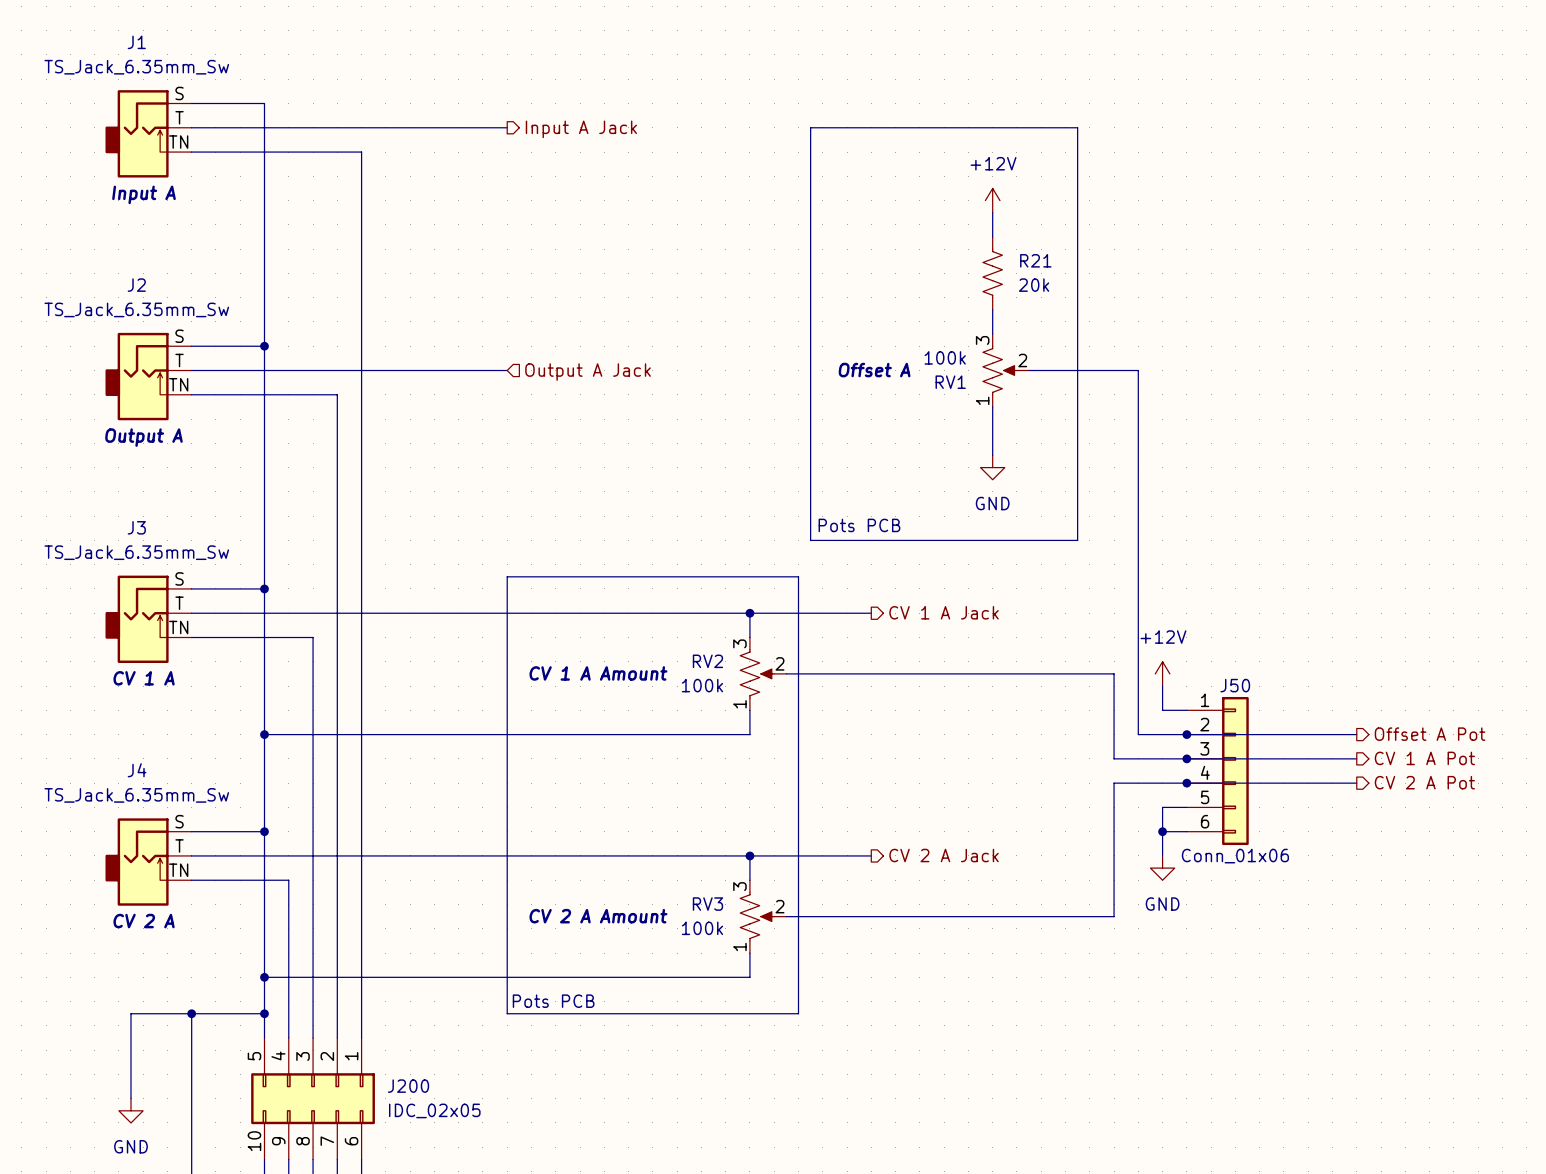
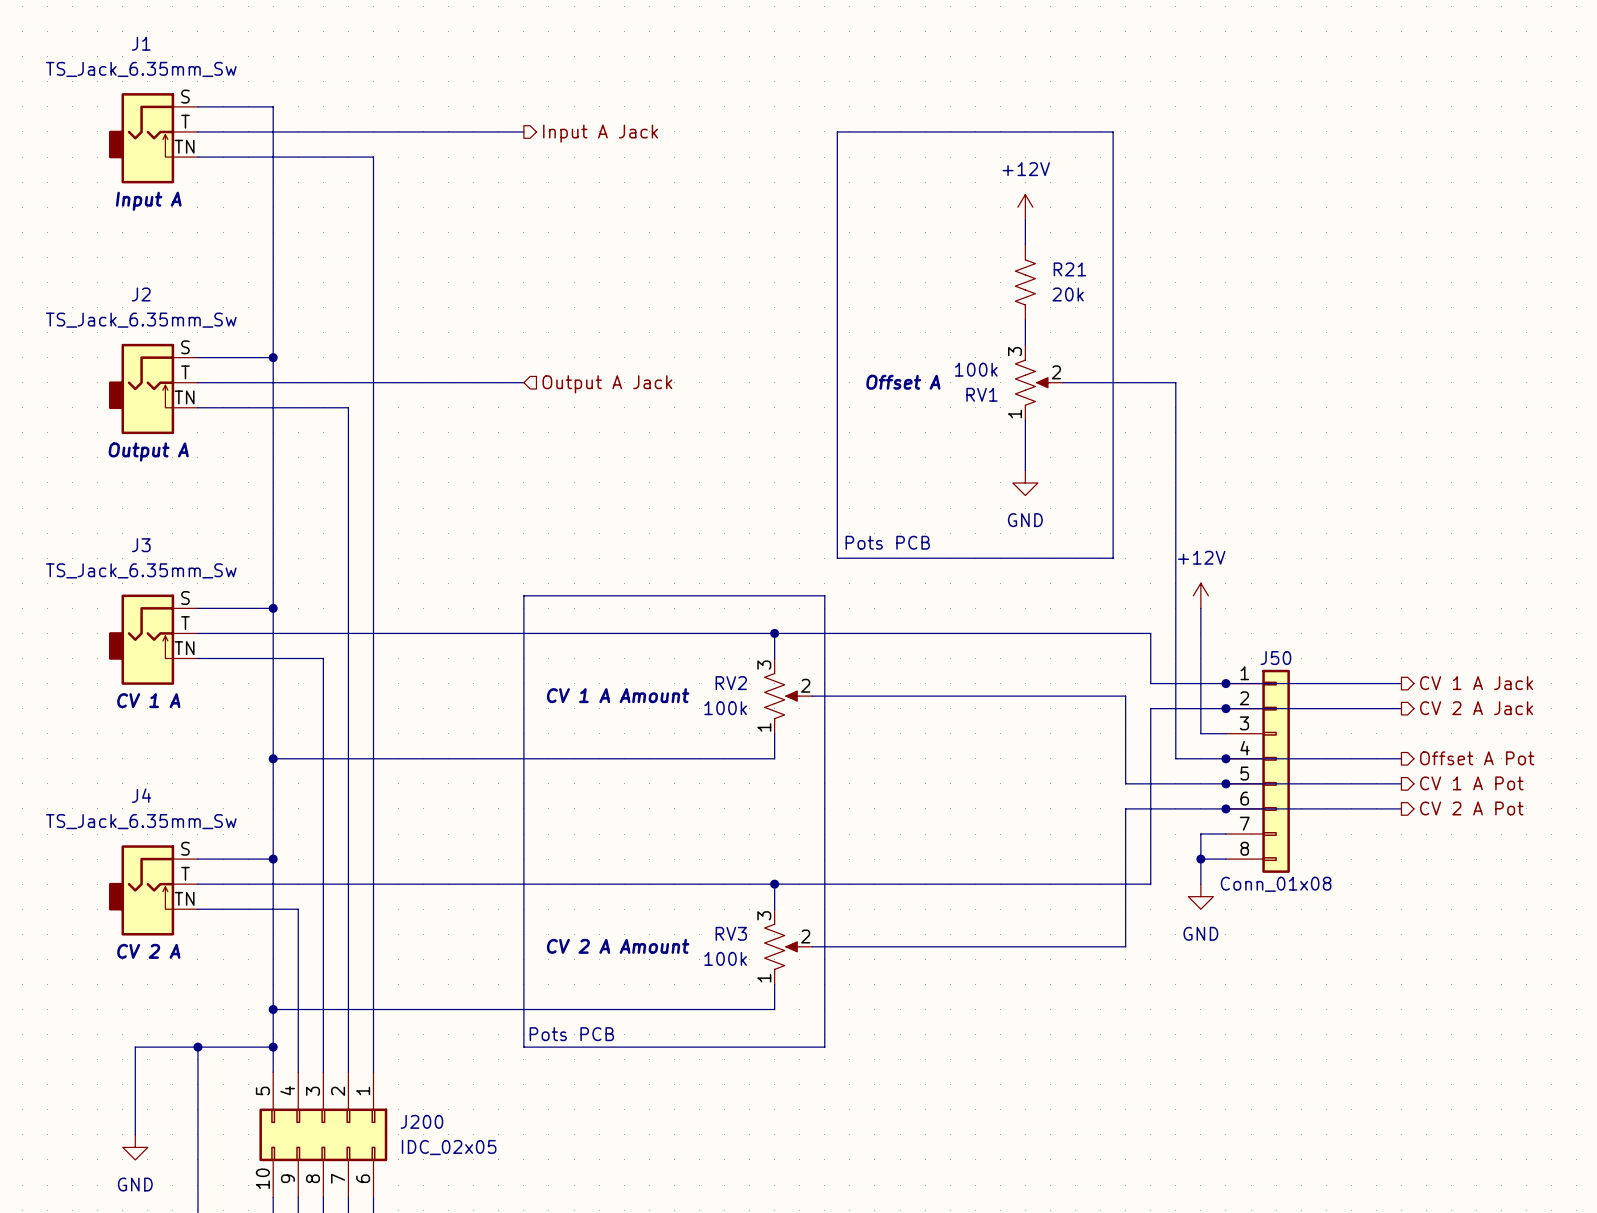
wire: none -> (1200, 608) (1200, 708)
hierarchical label: CV 1 A Jack (944, 612) -> none
wire: none -> (900, 633) (1150, 633) (1150, 683) (1401, 683)
junction: none -> (1225, 683)
hierarchical label: none -> CV 1 A Jack (1476, 683)
wire: (1089, 673) (1114, 673) (1114, 686) -> (1401, 708) (1150, 708)
power symbol position: +12V (1162, 673) -> +12V (1200, 595)
J50 name position: J50 (1235, 685) -> J50 (1275, 658)
hierarchical label: none -> CV 2 A Jack (1476, 708)
junction: none -> (1225, 708)
J50 symbol: [1186, 696, 1249, 846] -> [1225, 669, 1290, 873]
wire: none -> (900, 884) (1150, 884)
hierarchical label: CV 2 A Jack (944, 855) -> none
wire: (1114, 855) (1114, 916) (1089, 916) -> (1125, 696) (1125, 783) (1150, 783) (1150, 808) (1125, 808) (1125, 946)
J50 value: Conn_01x06 (1235, 856) -> Conn_01x08 (1276, 884)

